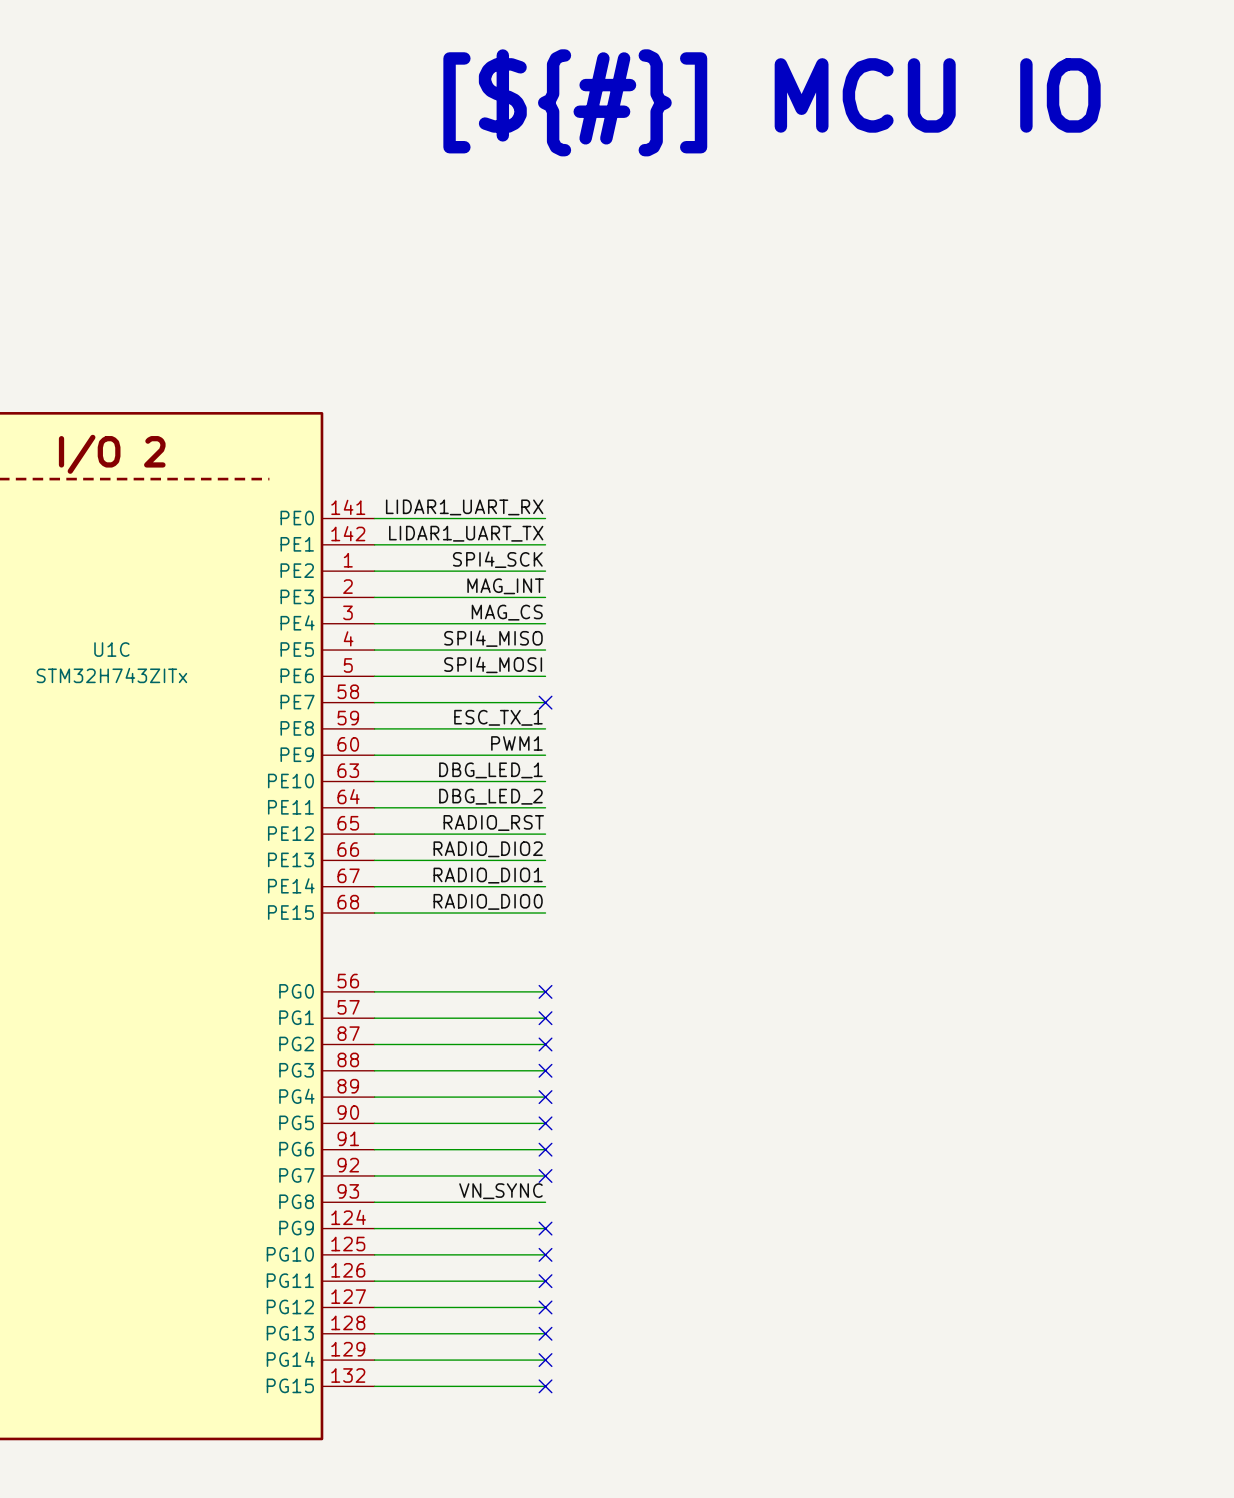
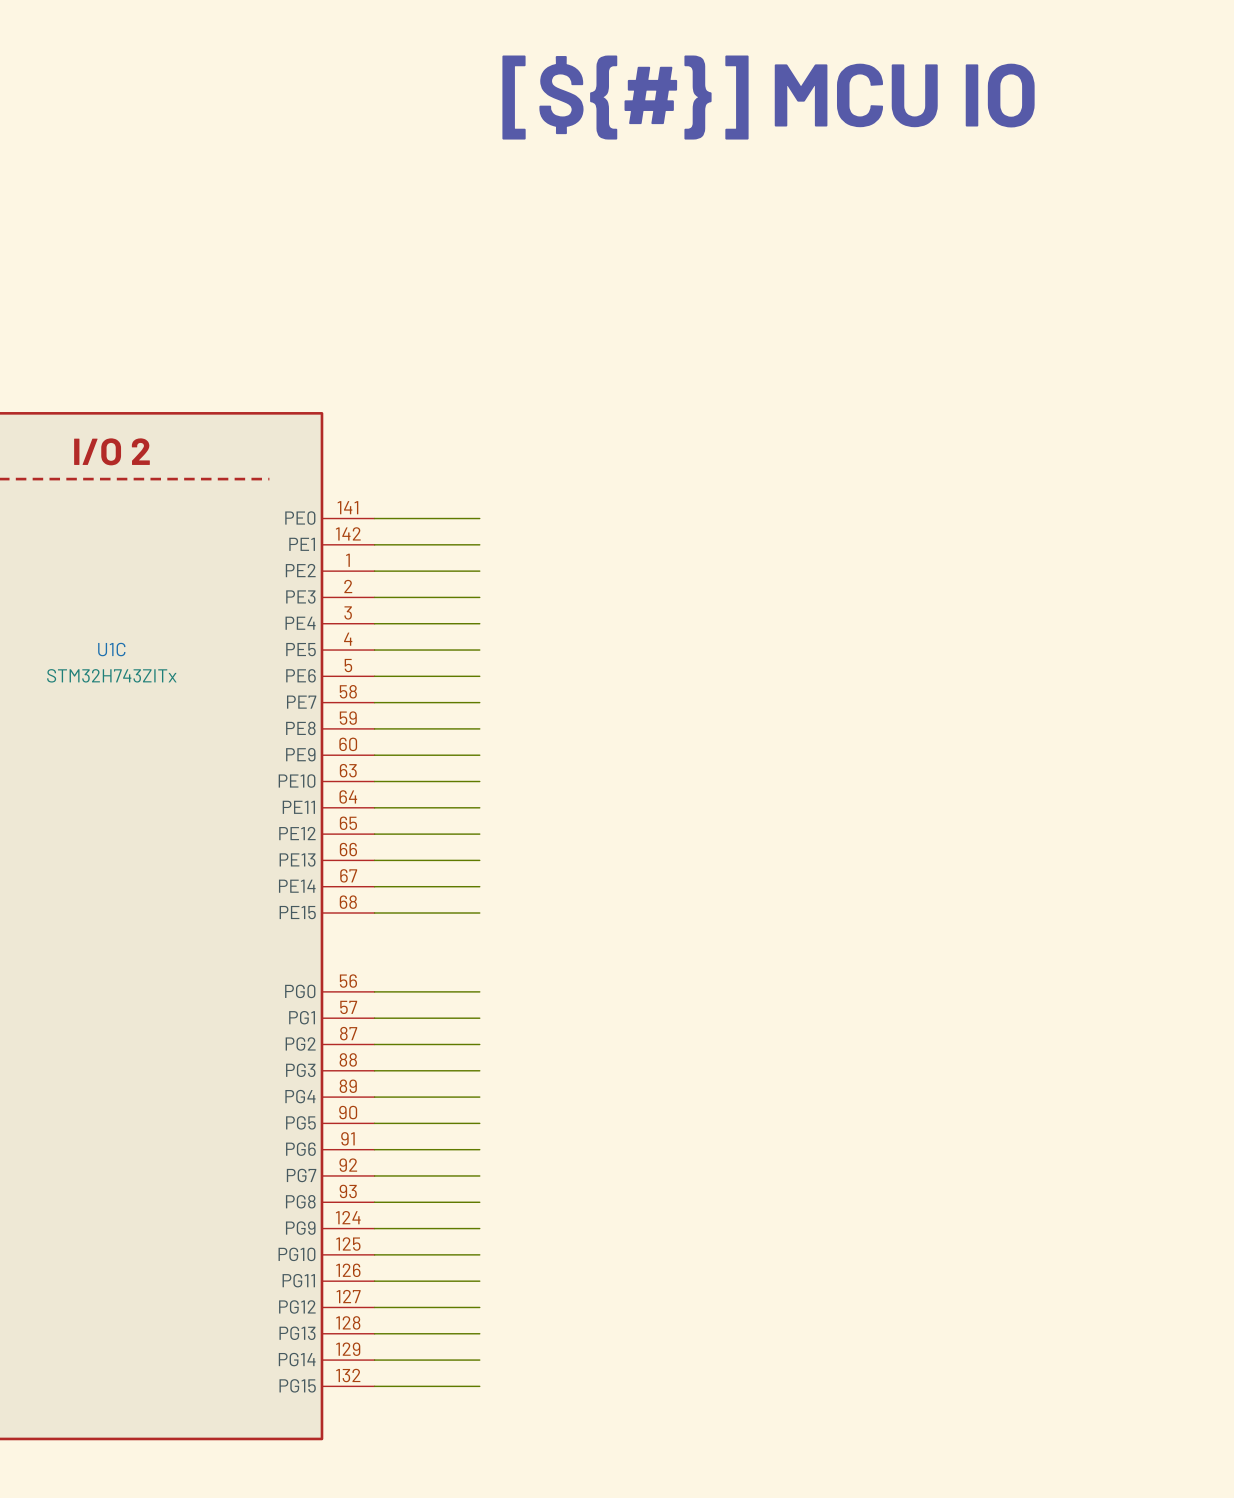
label: LIDAR1_UART_RX (464, 507) -> none
wire: (479, 518) (545, 518) -> none
label: LIDAR1_UART_TX (466, 533) -> none
wire: (479, 544) (545, 544) -> none
label: SPI4_SCK (497, 559) -> none
wire: (479, 571) (545, 571) -> none
label: MAG_INT (505, 586) -> none
wire: (479, 597) (545, 597) -> none
label: MAG_CS (507, 612) -> none
wire: (479, 623) (545, 623) -> none
label: SPI4_MISO (493, 638) -> none
wire: (479, 650) (545, 650) -> none
label: SPI4_MOSI (493, 664) -> none
wire: (479, 676) (545, 676) -> none
wire: (479, 702) (545, 702) -> none
no-connect mark: (545, 702) -> none
label: ESC_TX_1 (498, 717) -> none
wire: (479, 728) (545, 728) -> none
label: PWM1 (516, 743) -> none
wire: (479, 755) (545, 755) -> none
label: DBG_LED_1 (490, 770) -> none
wire: (479, 781) (545, 781) -> none
label: DBG_LED_2 (490, 796) -> none
wire: (479, 807) (545, 807) -> none
label: RADIO_RST (493, 823) -> none
wire: (479, 834) (545, 834) -> none
label: RADIO_DIO2 (488, 849) -> none
wire: (479, 860) (545, 860) -> none
label: RADIO_DIO1 (488, 875) -> none
wire: (479, 886) (545, 886) -> none
label: RADIO_DIO0 (488, 901) -> none
wire: (479, 913) (545, 913) -> none
wire: (479, 991) (545, 991) -> none
no-connect mark: (545, 991) -> none
wire: (479, 1018) (545, 1018) -> none
no-connect mark: (545, 1018) -> none
wire: (479, 1044) (545, 1044) -> none
no-connect mark: (545, 1044) -> none
wire: (479, 1070) (545, 1070) -> none
no-connect mark: (545, 1070) -> none
wire: (479, 1097) (545, 1097) -> none
no-connect mark: (545, 1097) -> none
wire: (479, 1123) (545, 1123) -> none
no-connect mark: (545, 1123) -> none
wire: (479, 1149) (545, 1149) -> none
no-connect mark: (545, 1149) -> none
wire: (479, 1175) (545, 1175) -> none
no-connect mark: (545, 1175) -> none
label: VN_SYNC (500, 1191) -> none
wire: (479, 1202) (545, 1202) -> none
wire: (479, 1228) (545, 1228) -> none
no-connect mark: (545, 1228) -> none
wire: (479, 1254) (545, 1254) -> none
no-connect mark: (545, 1254) -> none
wire: (479, 1281) (545, 1281) -> none
no-connect mark: (545, 1281) -> none
wire: (479, 1307) (545, 1307) -> none
no-connect mark: (545, 1307) -> none
wire: (479, 1333) (545, 1333) -> none
no-connect mark: (545, 1333) -> none
wire: (479, 1360) (545, 1360) -> none
no-connect mark: (545, 1360) -> none
wire: (479, 1386) (545, 1386) -> none
no-connect mark: (545, 1386) -> none

